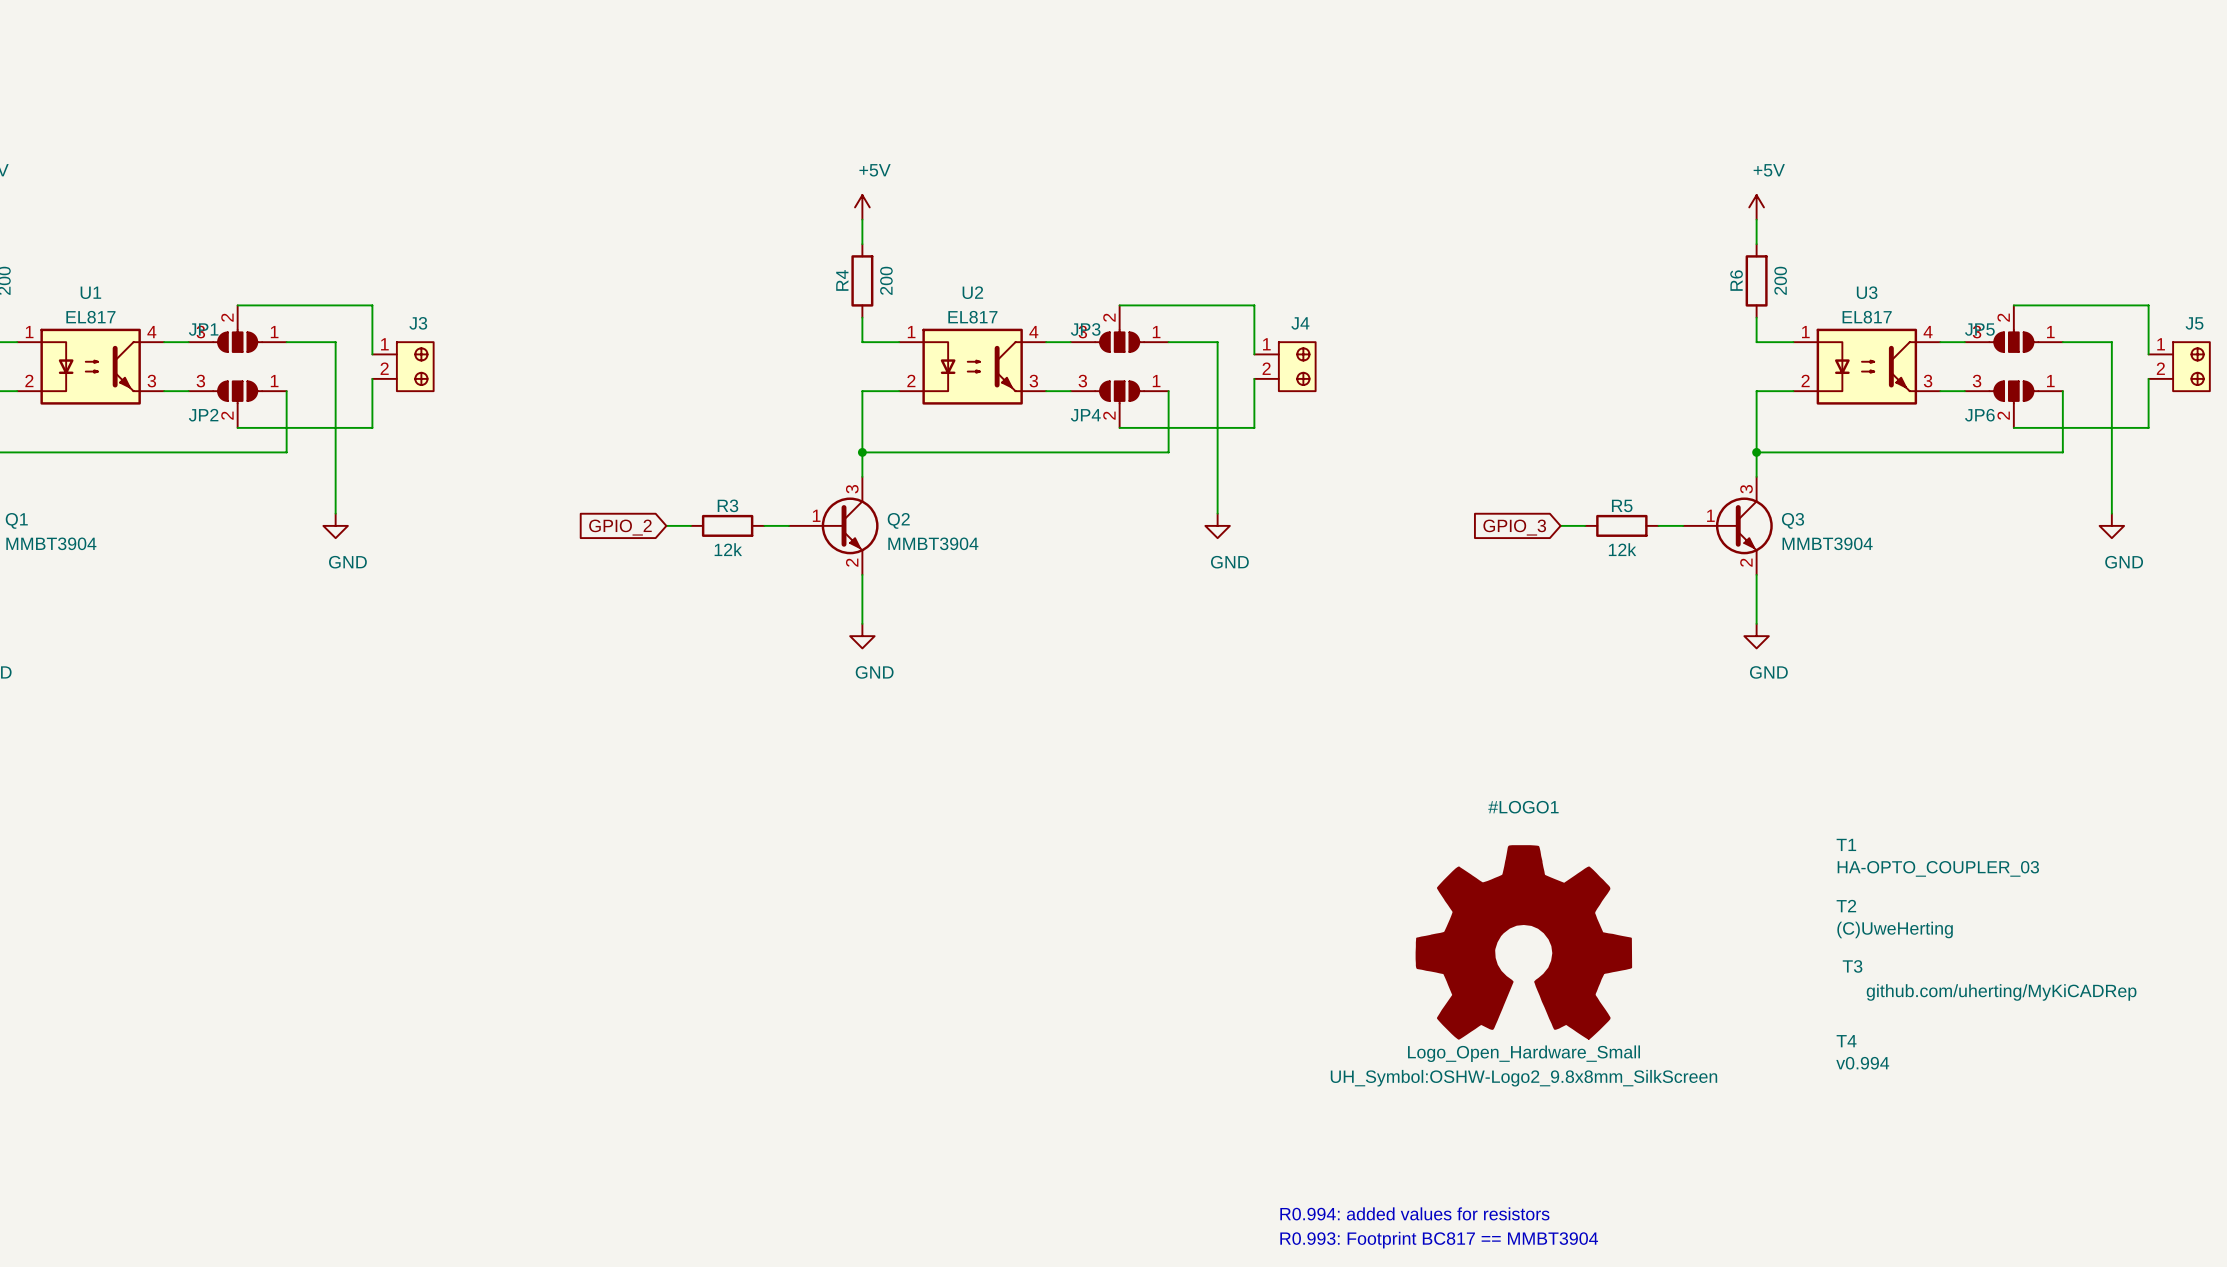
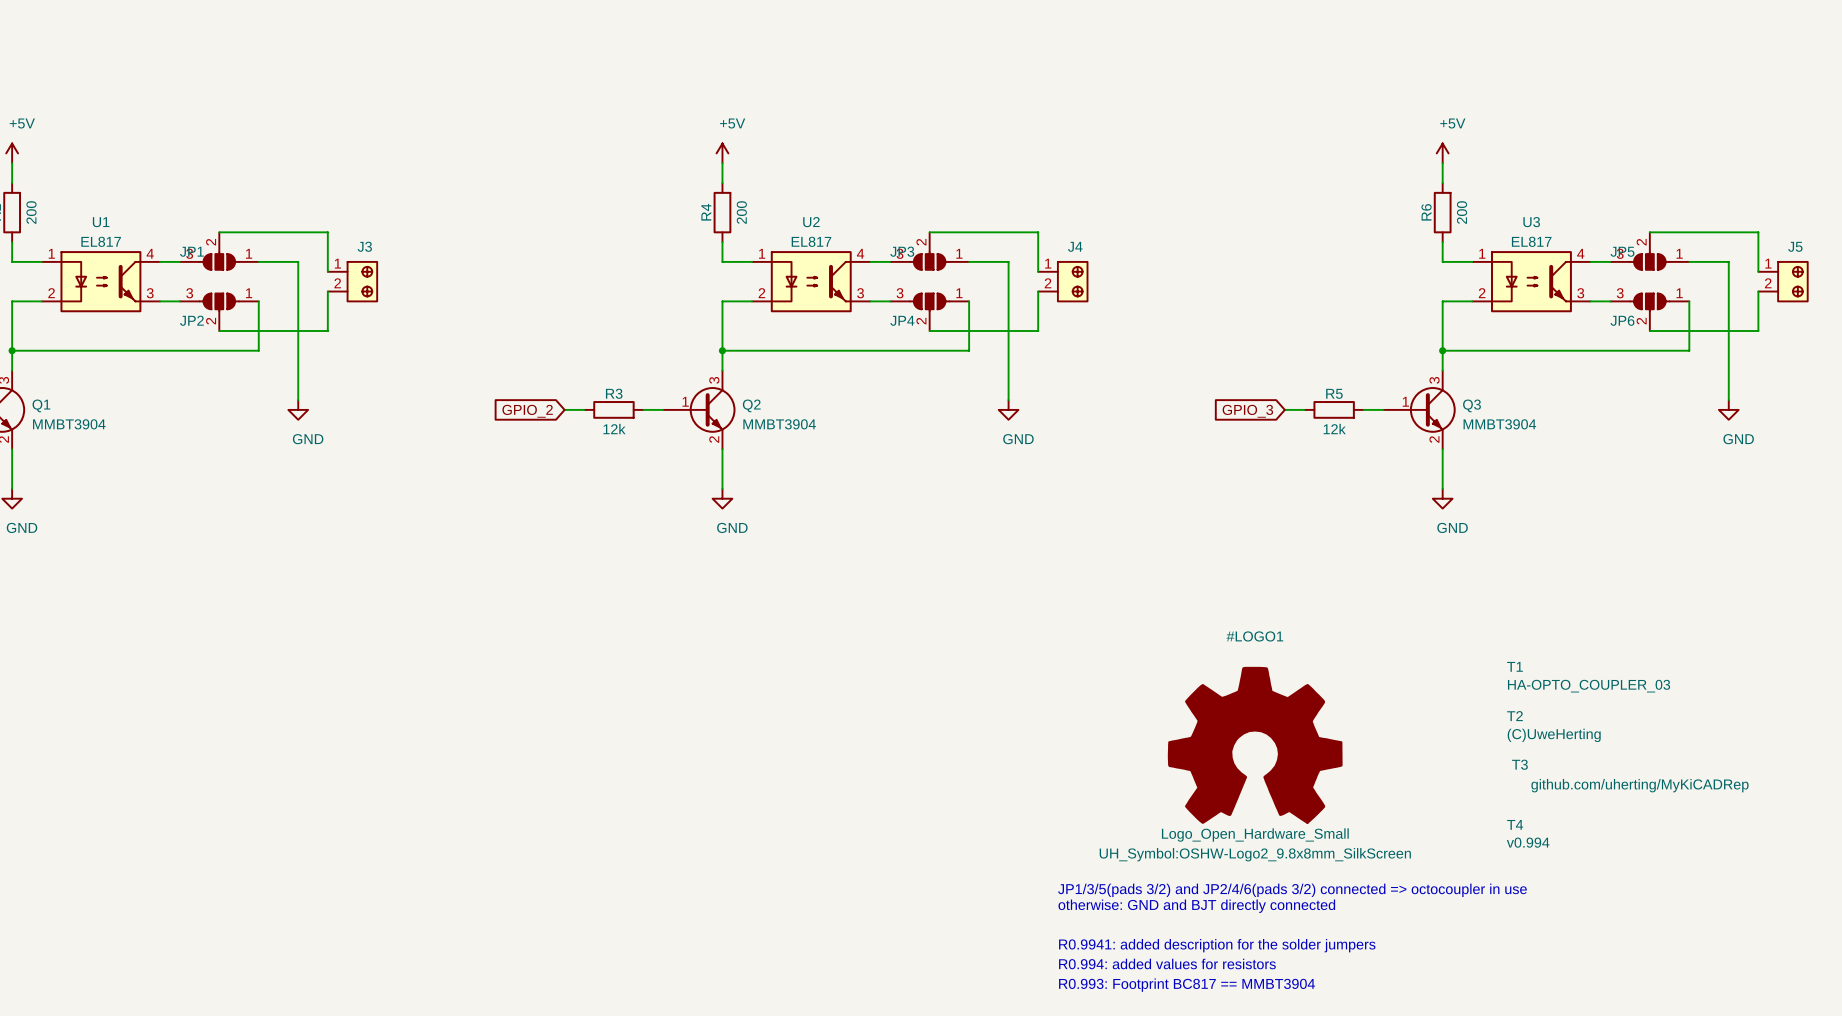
text: none -> JP1/3/5(pads 3/2) and JP2/4/6(pads 3/2) connected => octocoupler in use (1292, 890)
text: none -> otherwise: GND and BJT directly connected (1196, 906)
text: none -> R0.9941: added description for the solder jumpers (1217, 945)

